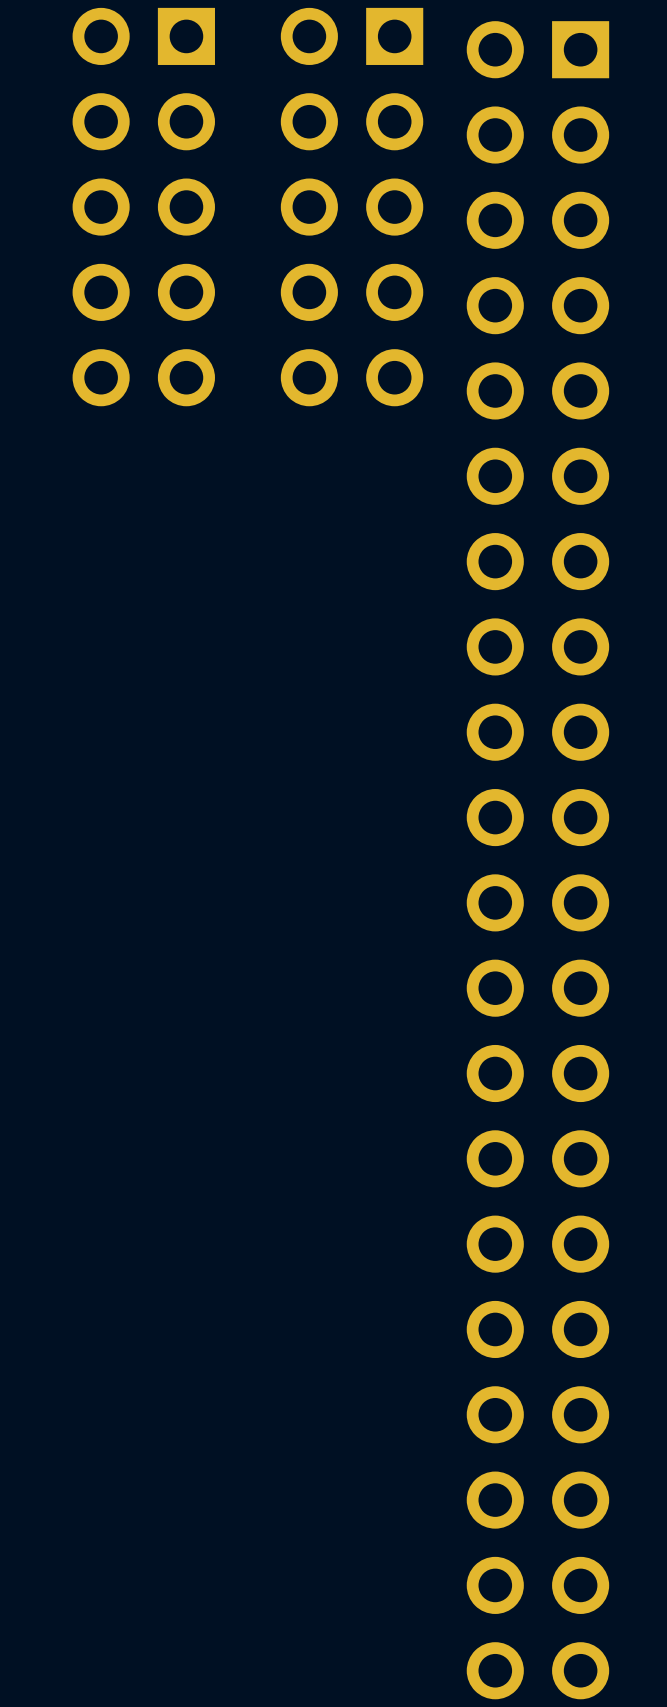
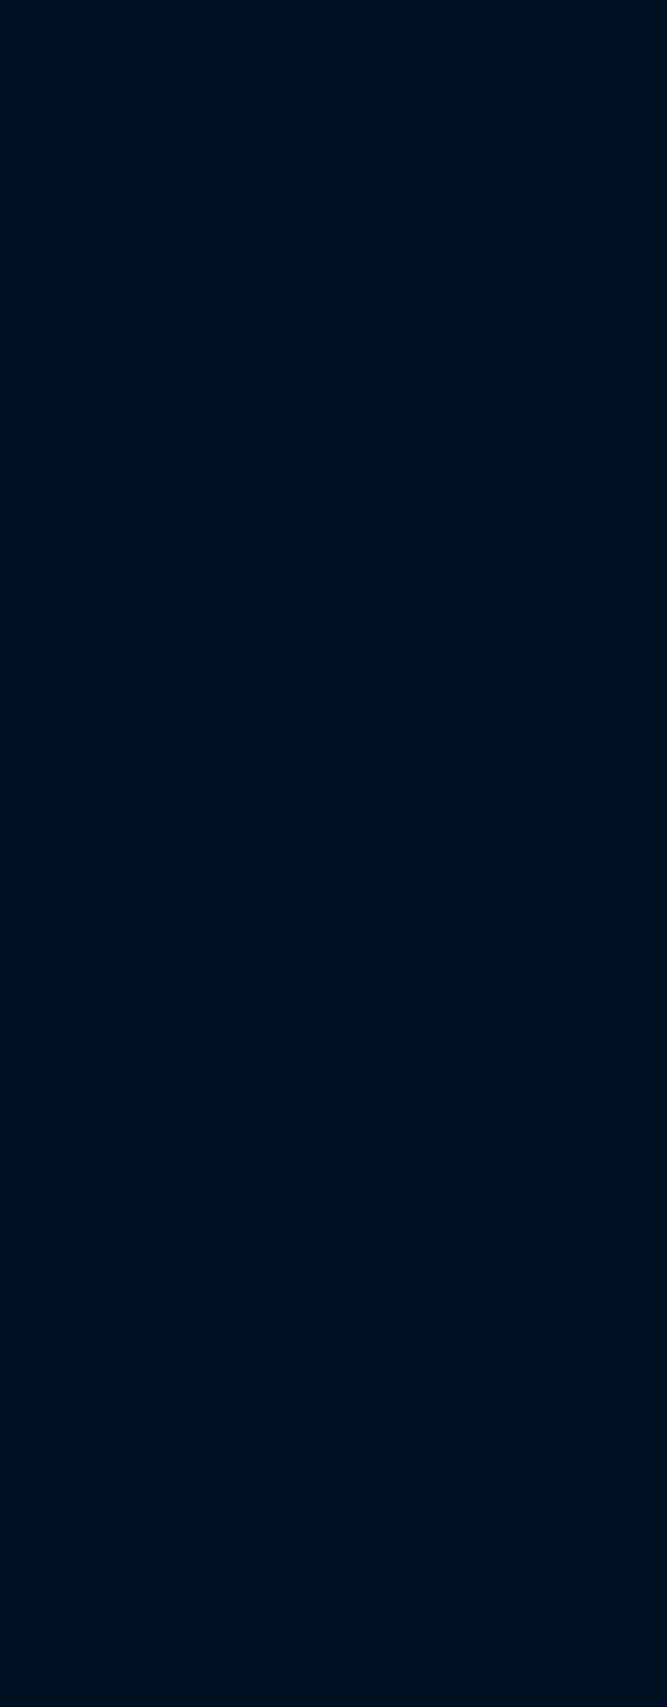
part: (143, 207) -> none
part: (352, 207) -> none
part: (537, 860) -> none

